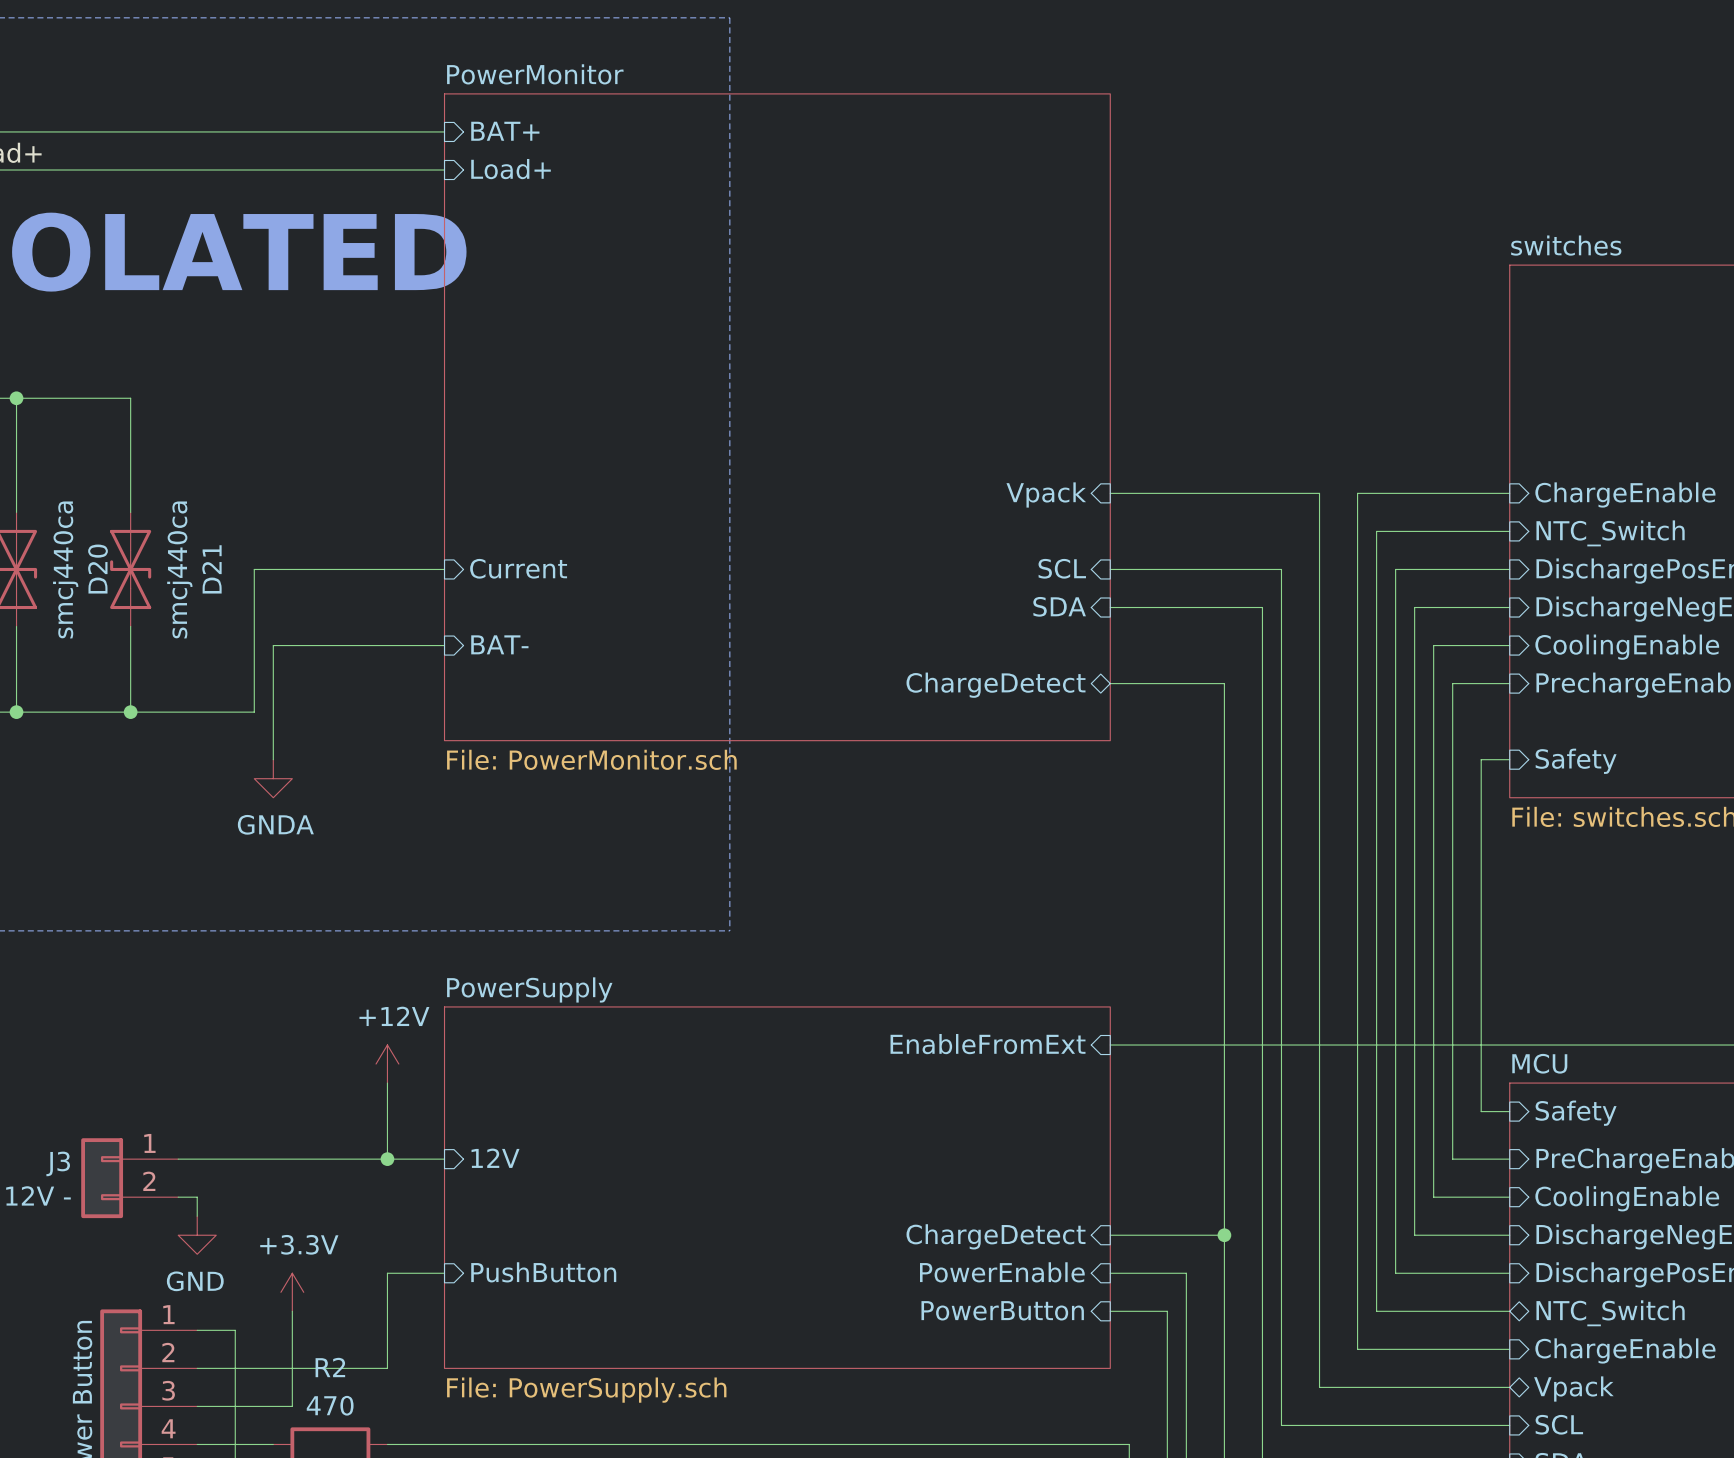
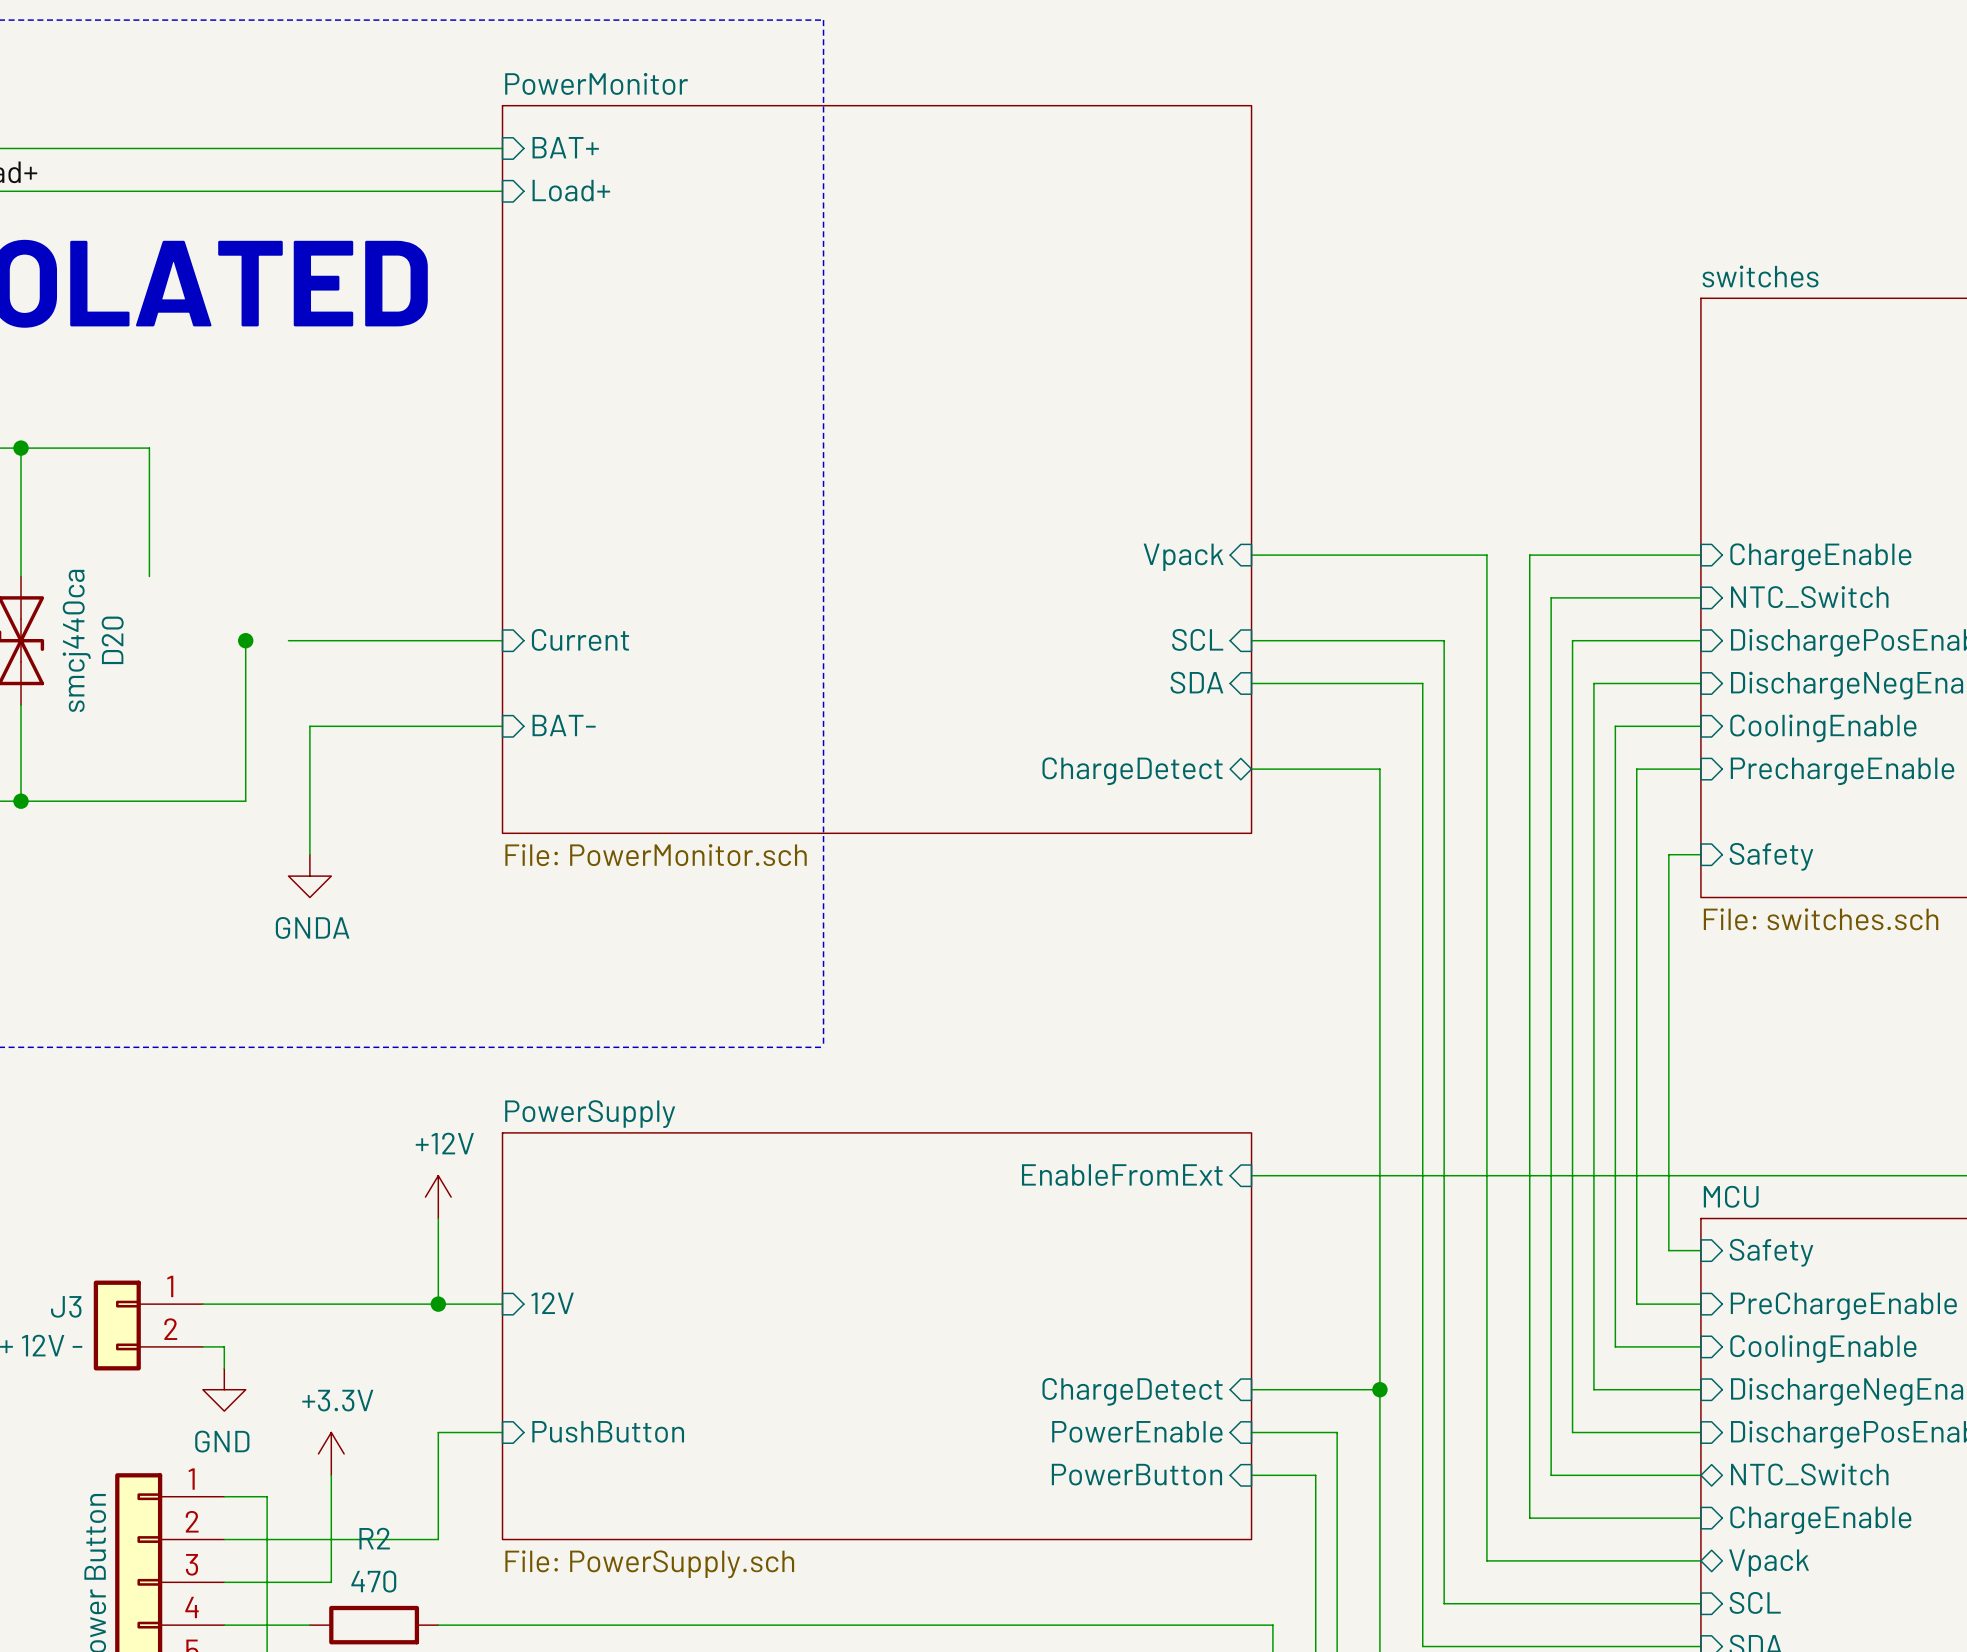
D21: smcj440ca (130, 569) -> none
junction: none -> (245, 640)
wire: (254, 569) (254, 712) (216, 712) -> (245, 640) (245, 801)
wire: (130, 626) (130, 712) -> none
junction: (130, 712) -> none

